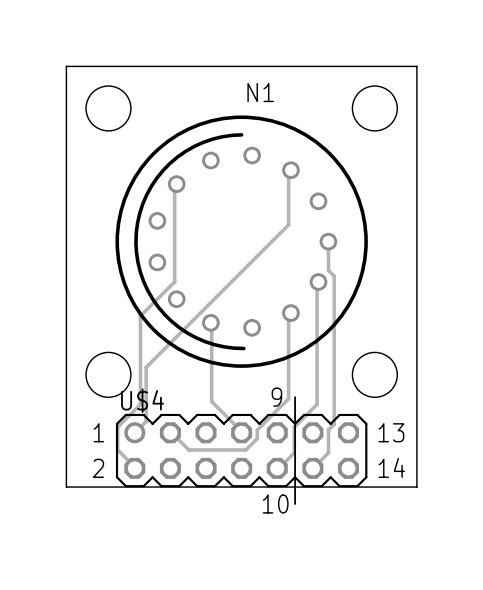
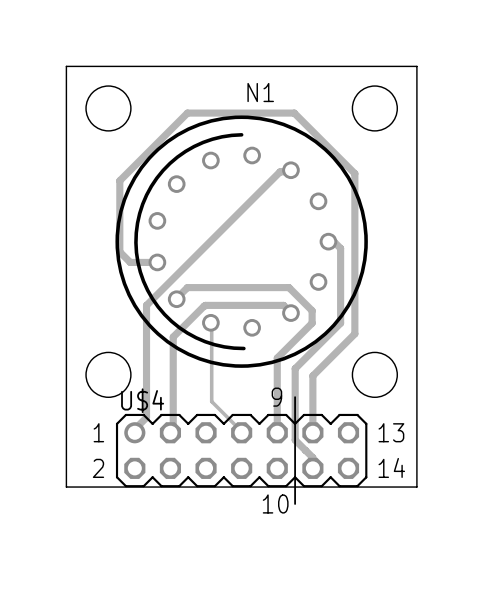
track: (290, 170) (288, 170) (288, 224) (146, 367) (146, 421) (134, 432) -> (290, 170) (290, 171) (280, 171) (146, 305) (146, 417) (135, 428) (134, 432)
track: (176, 184) (174, 185) (174, 281) (140, 316) (140, 404) (117, 427) (117, 449) (134, 468) -> none
track: (328, 241) (328, 270) (334, 276) (334, 424) (328, 430) (328, 452) (312, 468) -> (328, 241) (333, 241) (340, 248) (340, 323) (295, 368) (295, 440) (312, 457) (312, 468)
track: none -> (157, 262) (130, 262) (119, 251) (119, 180) (187, 113) (294, 113) (354, 173) (354, 333) (312, 375) (312, 432)
track: (318, 281) (317, 404) (294, 427) (294, 452) (277, 468) -> none
track: none -> (176, 299) (187, 287) (288, 287) (312, 310) (312, 323) (277, 358) (277, 432)
track: (290, 313) (288, 313) (288, 398) (257, 430) (257, 438) (245, 449) (188, 449) (170, 432) -> (290, 313) (283, 305) (204, 306) (173, 337) (173, 428) (170, 432)

